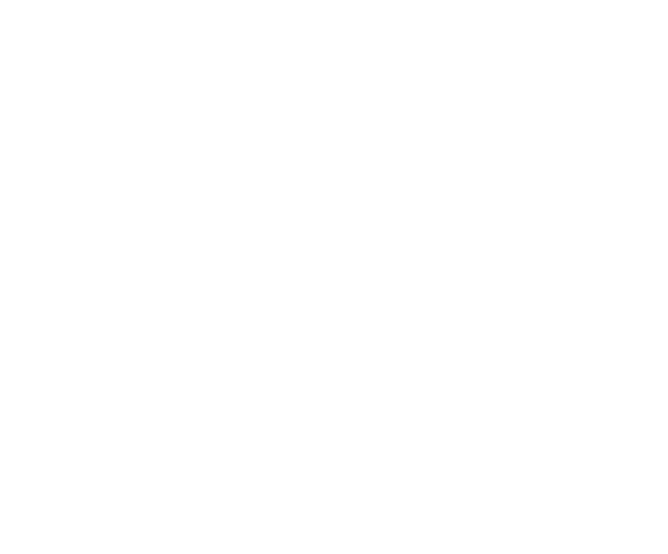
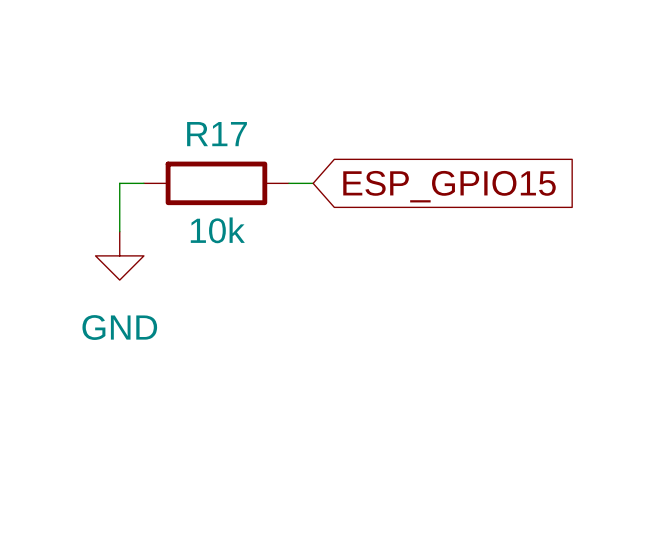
wire: none -> (143, 183) (119, 183) (119, 231)
R17: none -> 10k (216, 183)
wire: none -> (288, 183) (313, 183)
global label: none -> ESP_GPIO15 (449, 186)
power symbol: none -> GND (119, 255)

